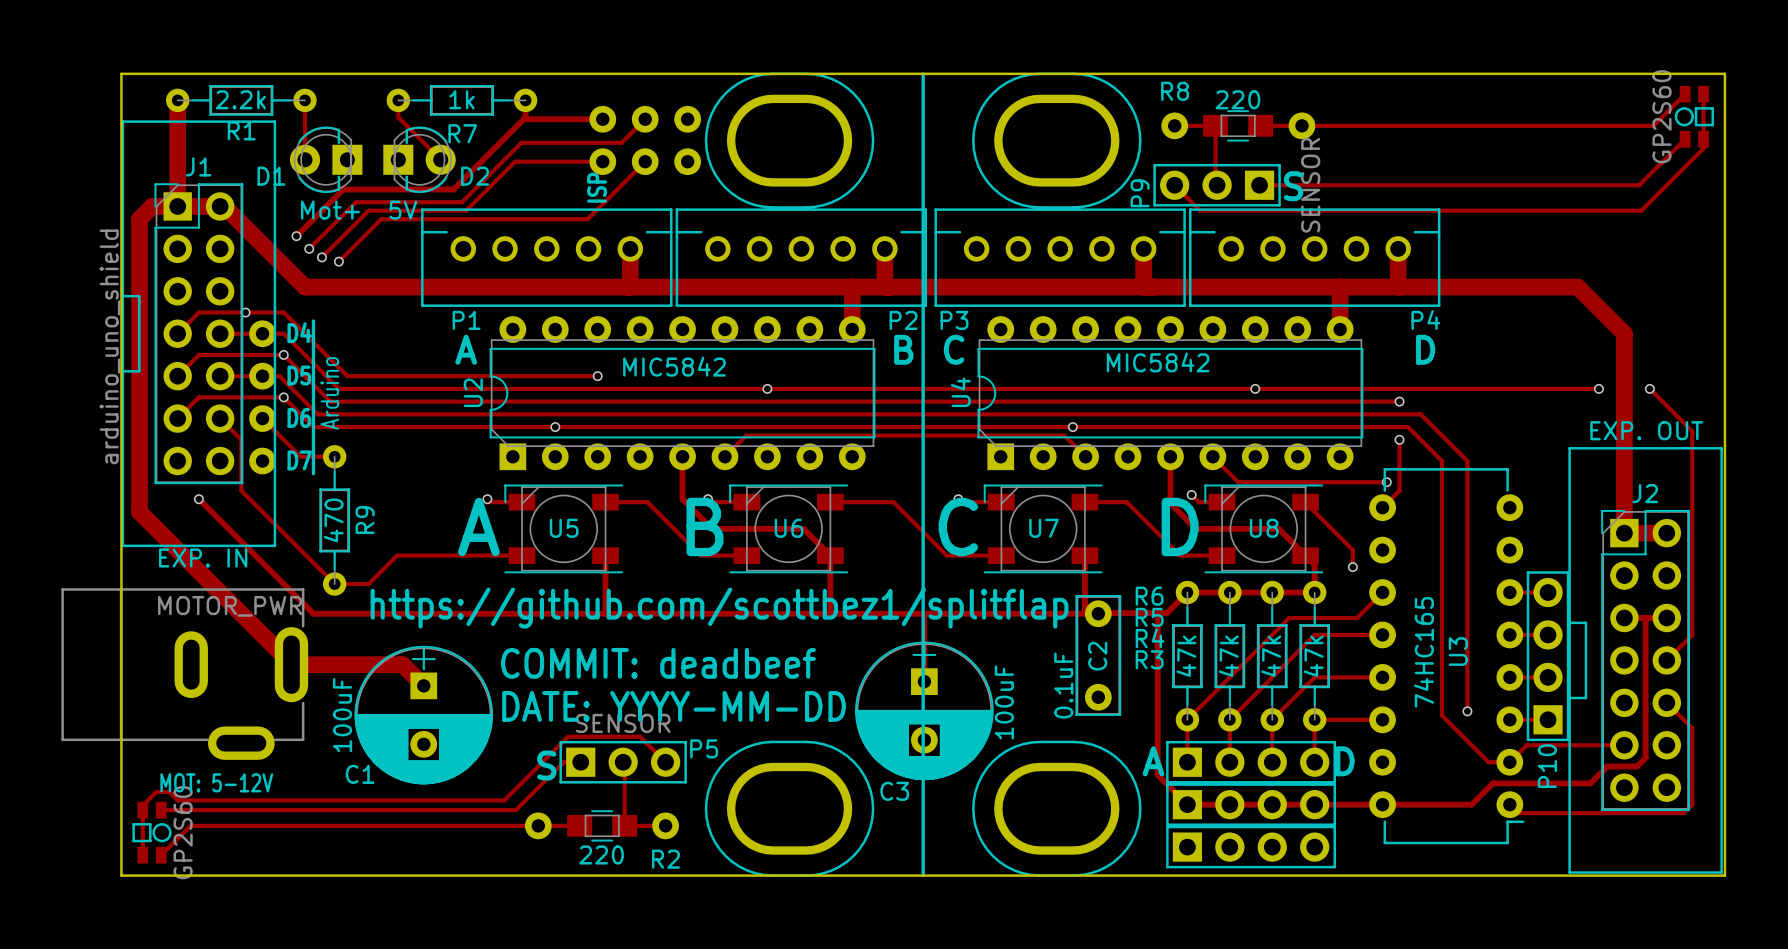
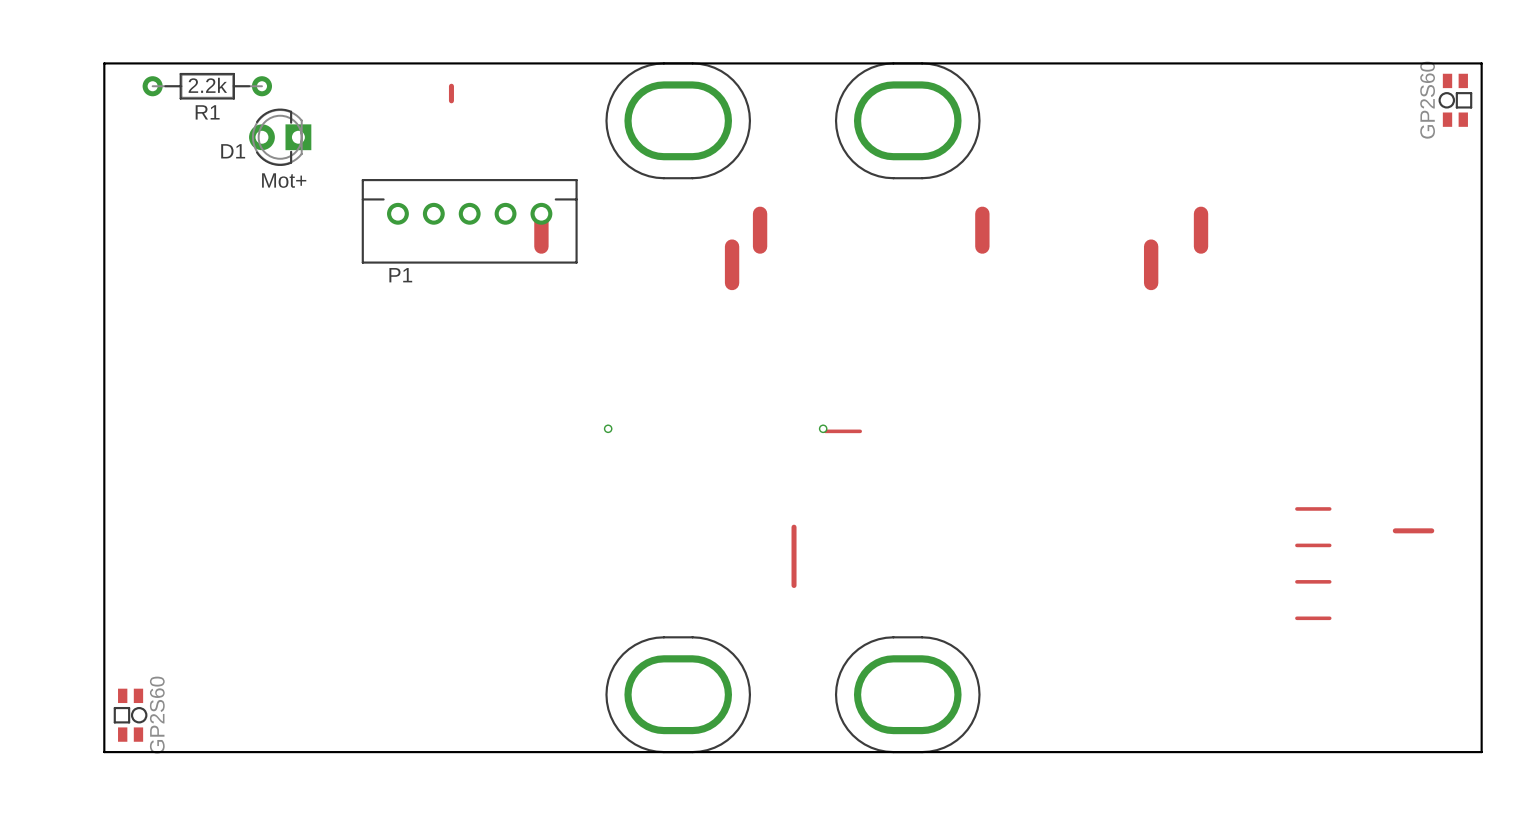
line: (923, 73) (923, 875) -> none
track: (1685, 94) (1653, 125) (1260, 125) -> none
track: (1703, 94) (1703, 148) (1641, 210) (1200, 210) (1174, 185) -> none
track: (177, 100) (177, 206) -> none
track: (304, 100) (304, 159) -> none
track: (398, 100) (398, 117) (440, 159) -> none
R7: 1k (461, 100) -> none
track: (602, 119) (527, 119) (525, 117) (453, 189) (343, 189) (296, 236) -> none
track: (645, 119) (621, 142) (521, 142) (461, 202) (355, 202) (309, 248) -> none
track: (1174, 125) (1215, 125) (1215, 183) (1217, 185) -> none
R8: 220 (1238, 125) -> none
track: (1685, 139) (1639, 185) (1259, 185) -> none
D2: 5V (419, 159) -> none
track: (602, 161) (515, 161) (466, 210) (368, 210) (321, 257) -> none
track: (645, 161) (587, 219) (381, 219) (338, 261) -> none
P9: SENSOR (1217, 185) -> none
text: S (1293, 186) -> none
text: ISP (597, 187) -> none
via: (296, 236) -> none
via: (309, 248) -> none
via: (321, 257) -> none
P2: (801, 257) -> none
P3: (1060, 257) -> none
P4: (1314, 257) -> none
via: (338, 261) -> none
part: arduino_uno_shield (475, 290) -> none
via: (245, 312) -> none
line: (313, 321) (313, 473) -> none
text: D4 (299, 332) -> none
track: (177, 333) (198, 312) (283, 312) (347, 376) (597, 376) -> none
J1: EXP. IN (198, 333) -> none
track: (220, 333) (283, 333) (338, 388) (1598, 388) -> none
text: A (466, 349) -> none
text: B (903, 349) -> none
text: C (954, 349) -> none
text: D (1425, 349) -> none
via: (283, 354) -> none
text: D5 (299, 375) -> none
track: (177, 376) (198, 354) (283, 354) (330, 401) (1399, 401) -> none
track: (220, 376) (279, 376) (317, 414) (1420, 414) (1467, 461) (1467, 711) -> none
via: (597, 376) -> none
via: (767, 388) -> none
via: (1255, 388) -> none
via: (1598, 388) -> none
track: (1649, 388) (1692, 431) (1692, 634) (1666, 660) -> none
via: (1649, 388) -> none
text: Arduino (329, 393) -> none
U2: MIC5842 (682, 393) -> none
U4: MIC5842 (1170, 393) -> none
via: (283, 397) -> none
via: (1399, 401) -> none
text: D6 (299, 417) -> none
track: (177, 418) (198, 397) (283, 397) (313, 427) (1408, 427) (1441, 461) (1441, 715) (1488, 762) (1509, 762) (1526, 745) (1624, 745) -> none
track: (220, 418) (241, 439) (241, 490) (334, 584) (368, 584) (397, 555) (522, 555) -> none
track: (262, 418) (300, 456) (334, 456) -> none
via: (555, 427) -> none
via: (1072, 427) -> none
track: (1399, 439) (1399, 490) (1382, 507) -> none
via: (1399, 439) -> none
track: (682, 456) (682, 499) (712, 528) (803, 528) (830, 555) (830, 613) -> none
track: (724, 456) (746, 435) (1064, 435) (1085, 456) -> none
track: (1170, 456) (1170, 503) (1195, 528) (1278, 528) (1314, 564) (1314, 592) (1187, 592) (1166, 613) (1084, 613) -> none
track: (1212, 456) (1238, 482) (1386, 482) -> none
text: D7 (299, 460) -> none
via: (1386, 482) -> none
track: (1191, 494) (1198, 502) (1222, 502) -> none
via: (1191, 494) -> none
track: (198, 499) (313, 613) (1084, 613) -> none
via: (198, 499) -> none
track: (487, 499) (490, 502) (522, 502) -> none
via: (487, 499) -> none
track: (708, 499) (710, 502) (746, 502) -> none
track: (605, 502) (647, 502) (700, 555) (746, 555) -> none
track: (830, 502) (893, 502) (946, 555) (1001, 555) -> none
track: (1084, 502) (1126, 502) (1180, 555) (1222, 555) -> none
track: (1305, 502) (1352, 550) (1352, 567) -> none
R9: 470 (334, 520) -> none
text: A (478, 527) -> none
text: B (704, 527) -> none
text: C (958, 527) -> none
text: D (1180, 527) -> none
U5: (563, 528) -> none
U6: (788, 528) -> none
U7: (1043, 528) -> none
U8: (1263, 528) -> none
track: (1666, 533) (1624, 533) (1624, 333) (1577, 287) (304, 287) (224, 206) (152, 206) (139, 219) (139, 511) (291, 664) (402, 664) (423, 685) -> none
track: (605, 555) (606, 613) -> none
track: (1084, 555) (1084, 613) -> none
via: (1352, 567) -> none
track: (1382, 592) (1357, 617) (1289, 617) (1187, 719) (1187, 762) -> none
text: https://github.com/scottbez1/splitflap (719, 608) -> none
track: (1157, 613) (1157, 774) (1187, 804) (1471, 804) (1492, 783) (1590, 783) (1607, 766) (1637, 766) (1645, 757) (1645, 617) -> none
track: (1382, 634) (1314, 634) (1229, 719) (1229, 762) -> none
C2: 0.1uF (1098, 655) -> none
R6: 47k (1187, 656) -> none
R5: 47k (1229, 656) -> none
R4: 47k (1272, 656) -> none
R3: 47k (1314, 656) -> none
U3: 74HC165 (1446, 656) -> none
P10: (1548, 656) -> none
J2: EXP. OUT (1645, 660) -> none
text: COMMIT: deadbeef (658, 663) -> none
part: MOTOR_PWR (184, 674) -> none
track: (1382, 677) (1314, 677) (1272, 719) (1272, 762) -> none
track: (1666, 702) (1692, 728) (1692, 804) (1683, 813) (1518, 813) (1509, 804) -> none
text: DATE: YYYY-MM-DD (674, 706) -> none
C3: 100uF (924, 710) -> none
via: (1467, 711) -> none
C1: 100uF (423, 715) -> none
track: (1382, 719) (1314, 719) (1314, 762) -> none
text: A (1153, 761) -> none
text: D (1344, 761) -> none
track: (580, 762) (563, 762) (515, 810) (161, 810) -> none
track: (623, 762) (624, 763) (624, 825) (665, 825) -> none
P5: SENSOR (623, 762) -> none
track: (665, 762) (640, 736) (568, 736) (504, 800) (177, 800) (169, 791) (156, 791) (142, 805) (142, 855) -> none
part: (1251, 762) -> none
text: S (546, 765) -> none
text: MOT: 5-12V (216, 782) -> none
part: (1251, 804) -> none
track: (579, 825) (190, 825) (161, 855) -> none
R2: 220 (601, 825) -> none
part: (1251, 847) -> none

